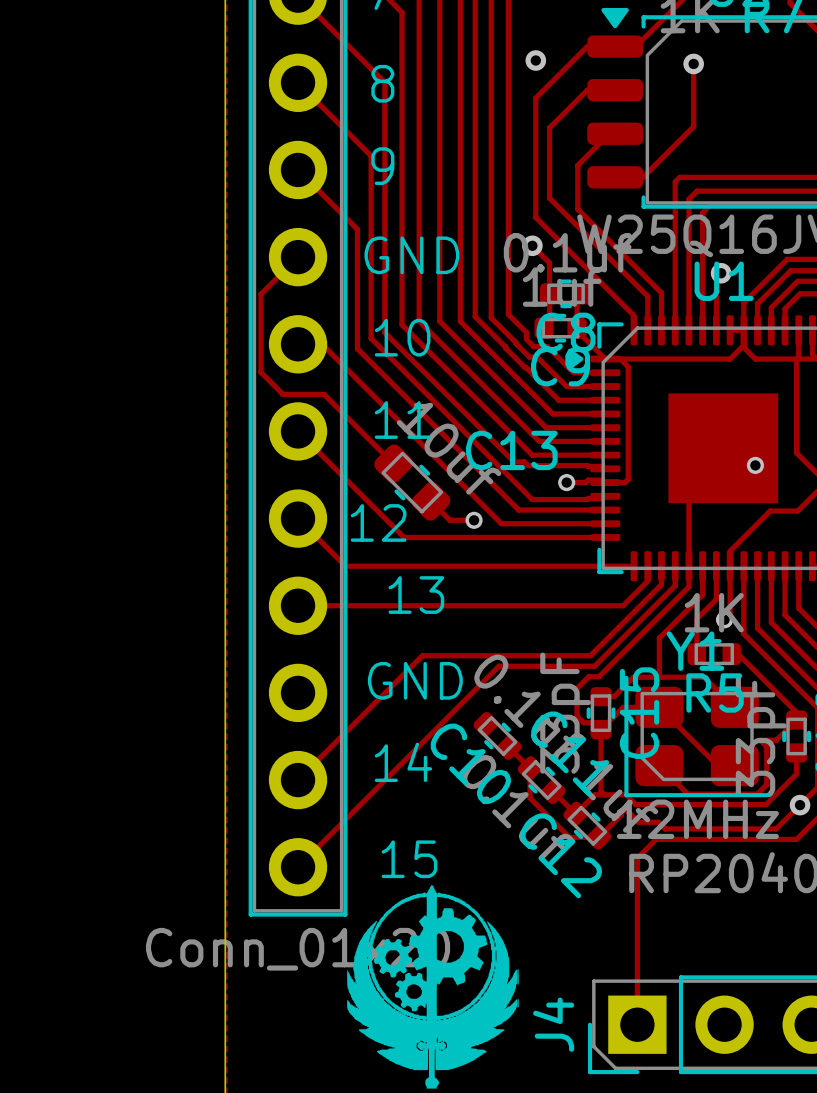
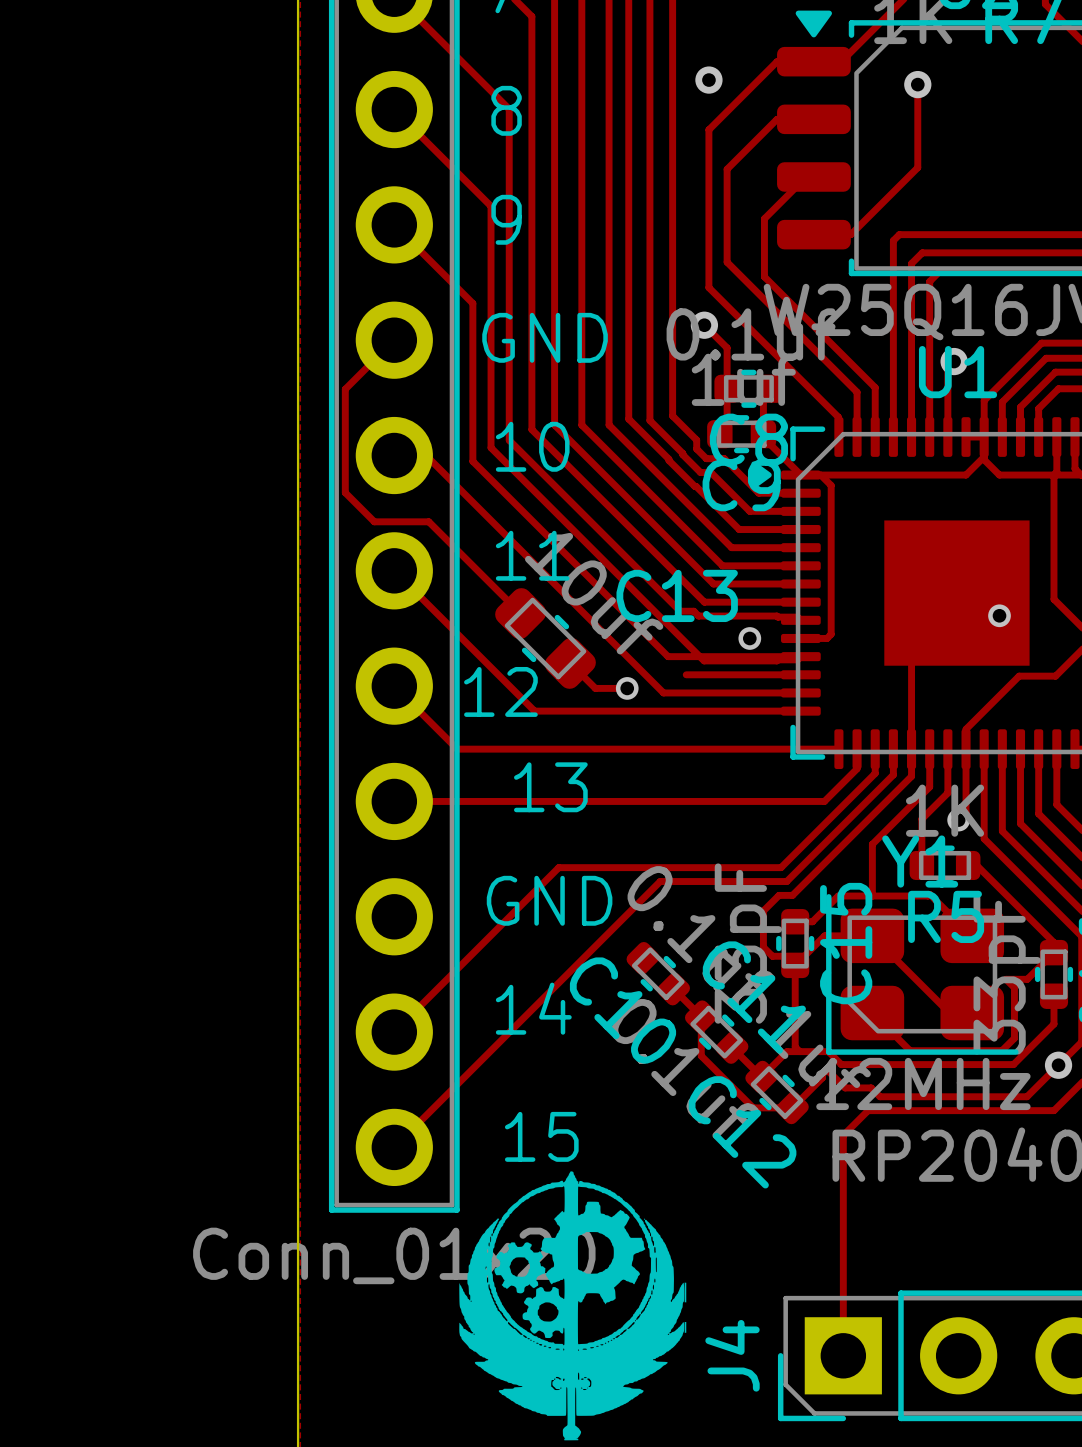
track: (566, 482) (585, 482) (587, 480) (602, 480) (605, 482) -> none
track: (504, 496) (518, 510) -> (668, 656) (800, 656)

